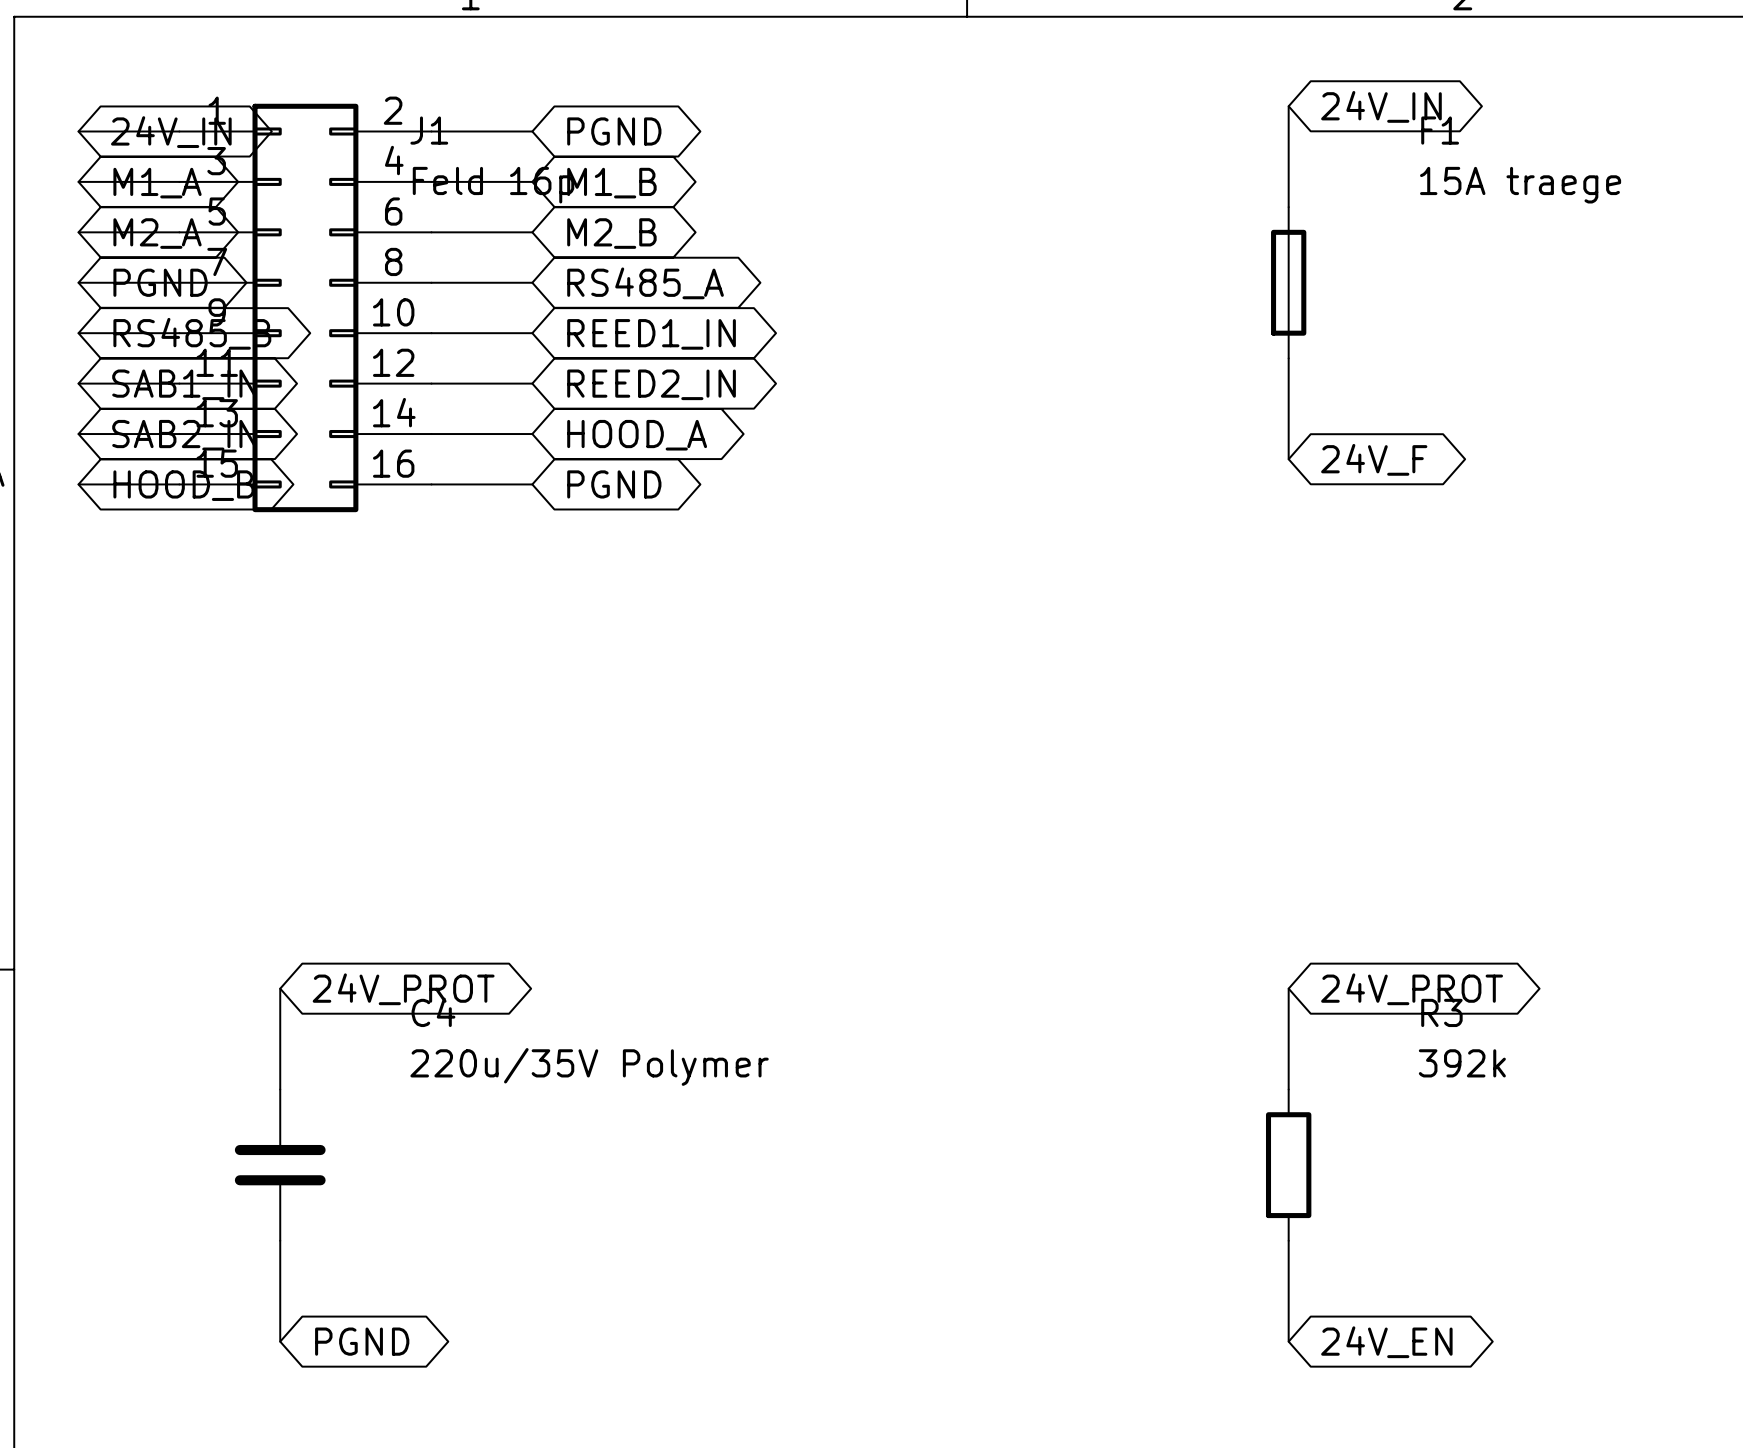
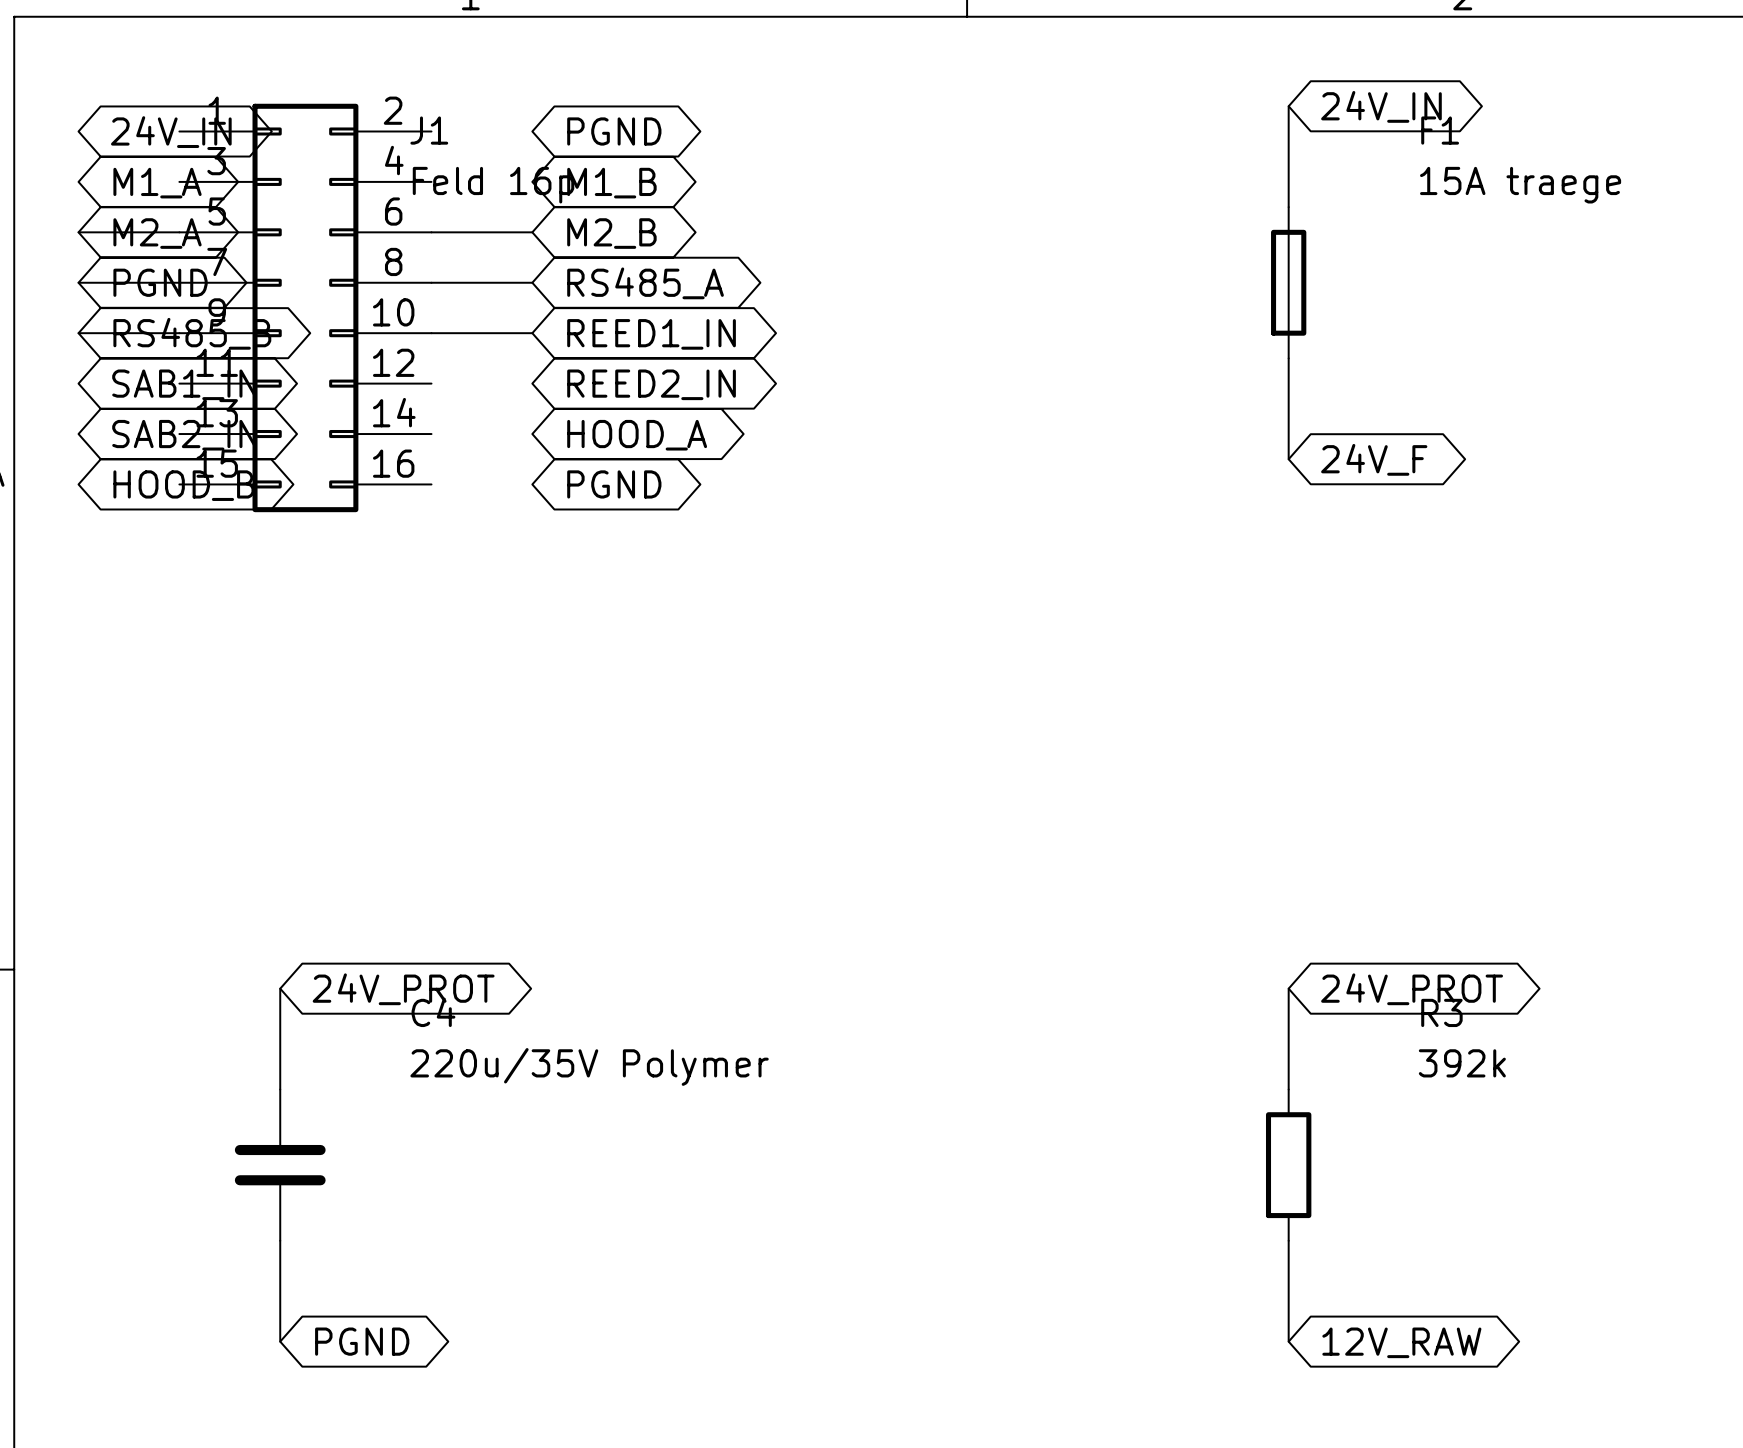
wire: (78, 131) (179, 131) -> none
wire: (431, 131) (532, 131) -> none
wire: (78, 181) (179, 181) -> none
wire: (431, 181) (532, 181) -> none
wire: (78, 383) (179, 383) -> none
wire: (431, 383) (532, 383) -> none
wire: (78, 434) (179, 434) -> none
wire: (431, 434) (532, 434) -> none
wire: (78, 484) (179, 484) -> none
wire: (431, 484) (532, 484) -> none
global label: 24V_EN (1386, 1342) -> 12V_RAW (1401, 1342)

